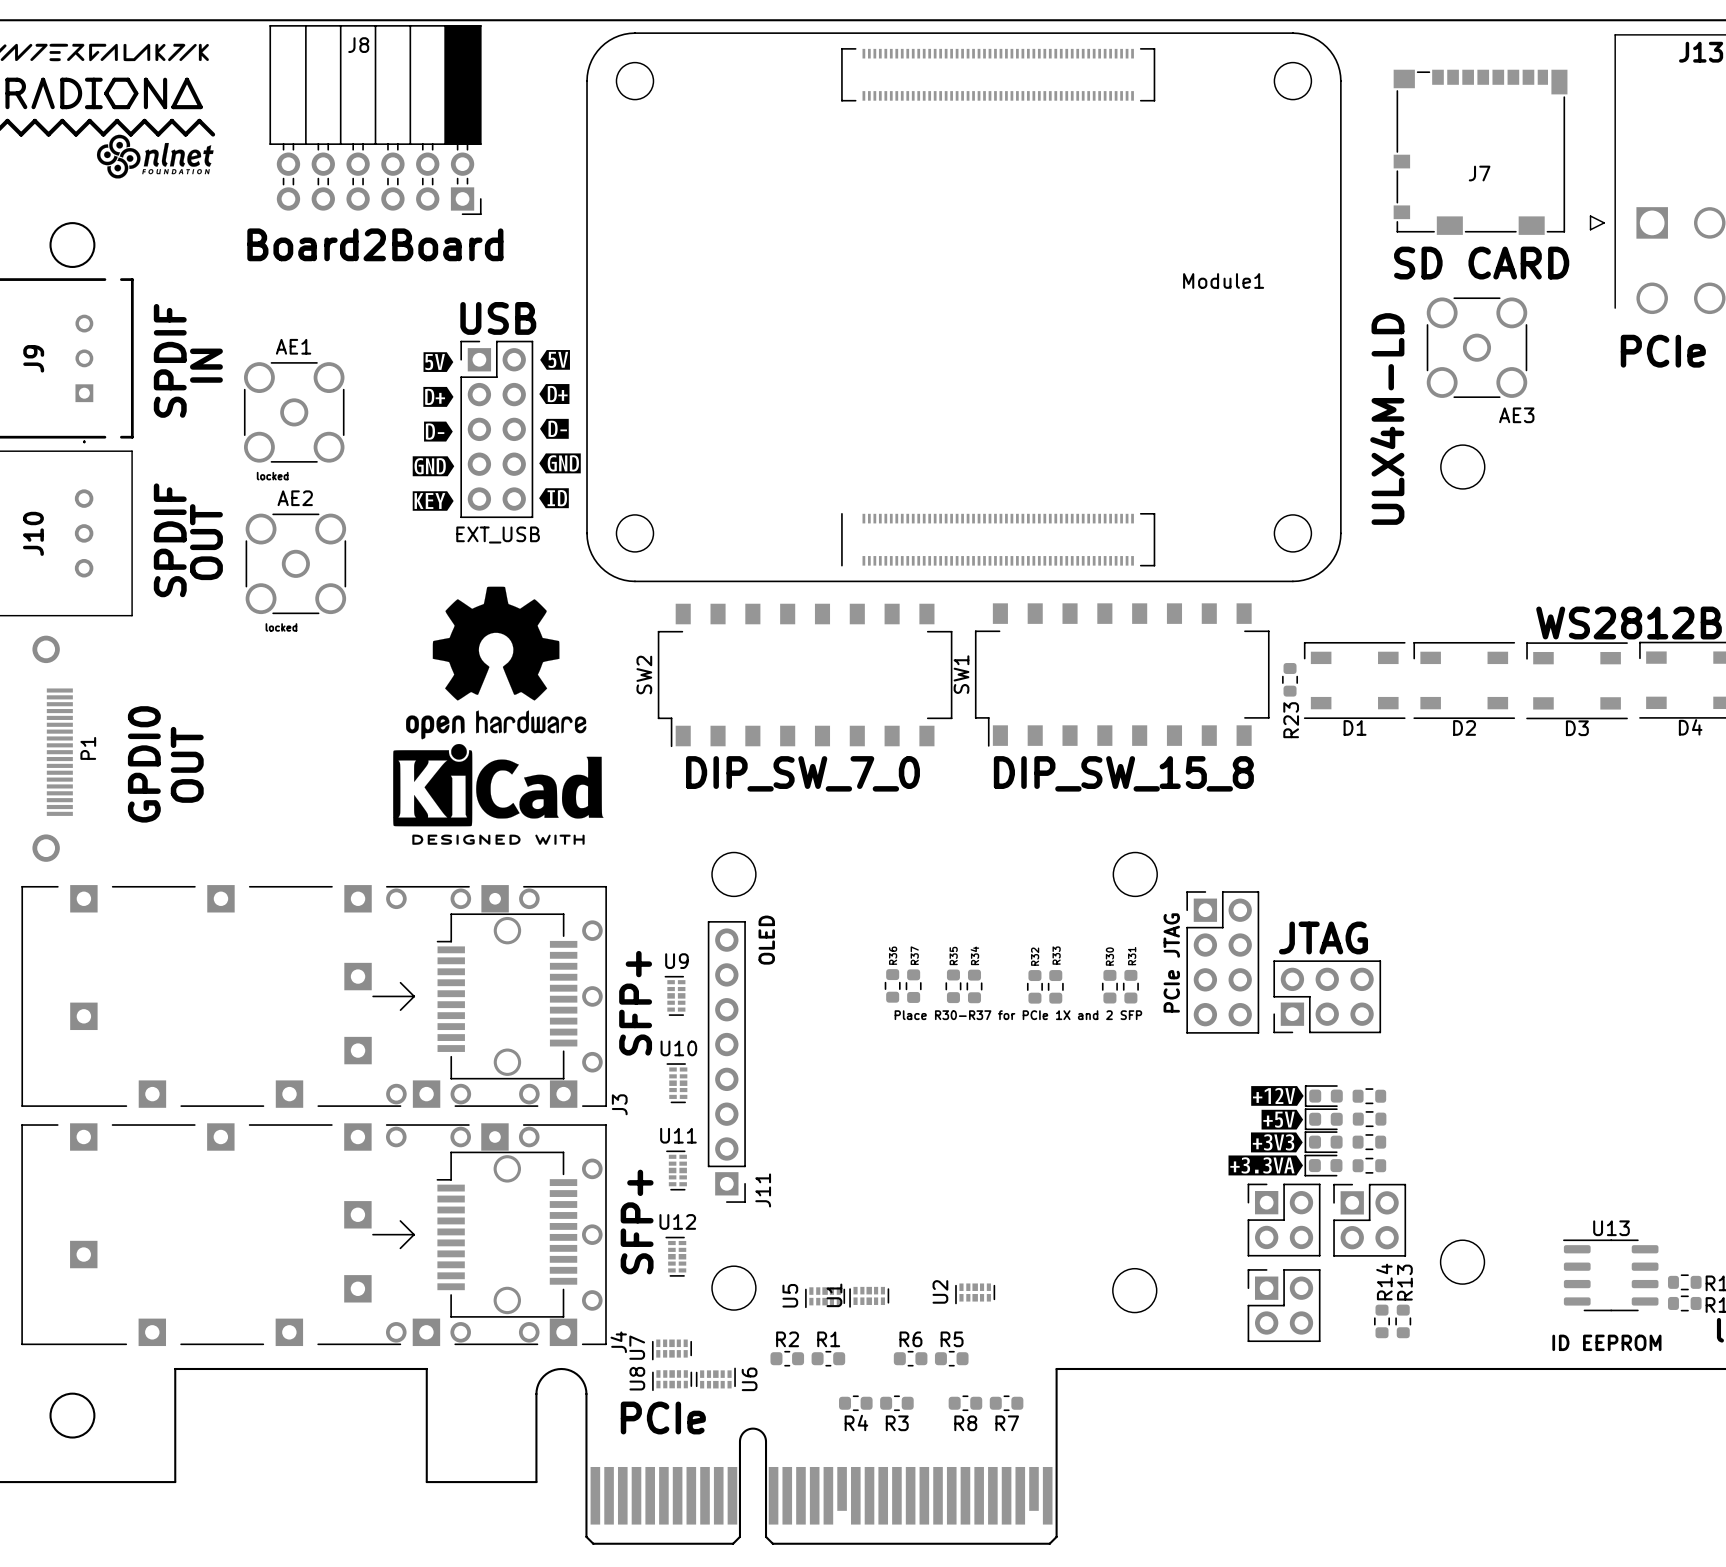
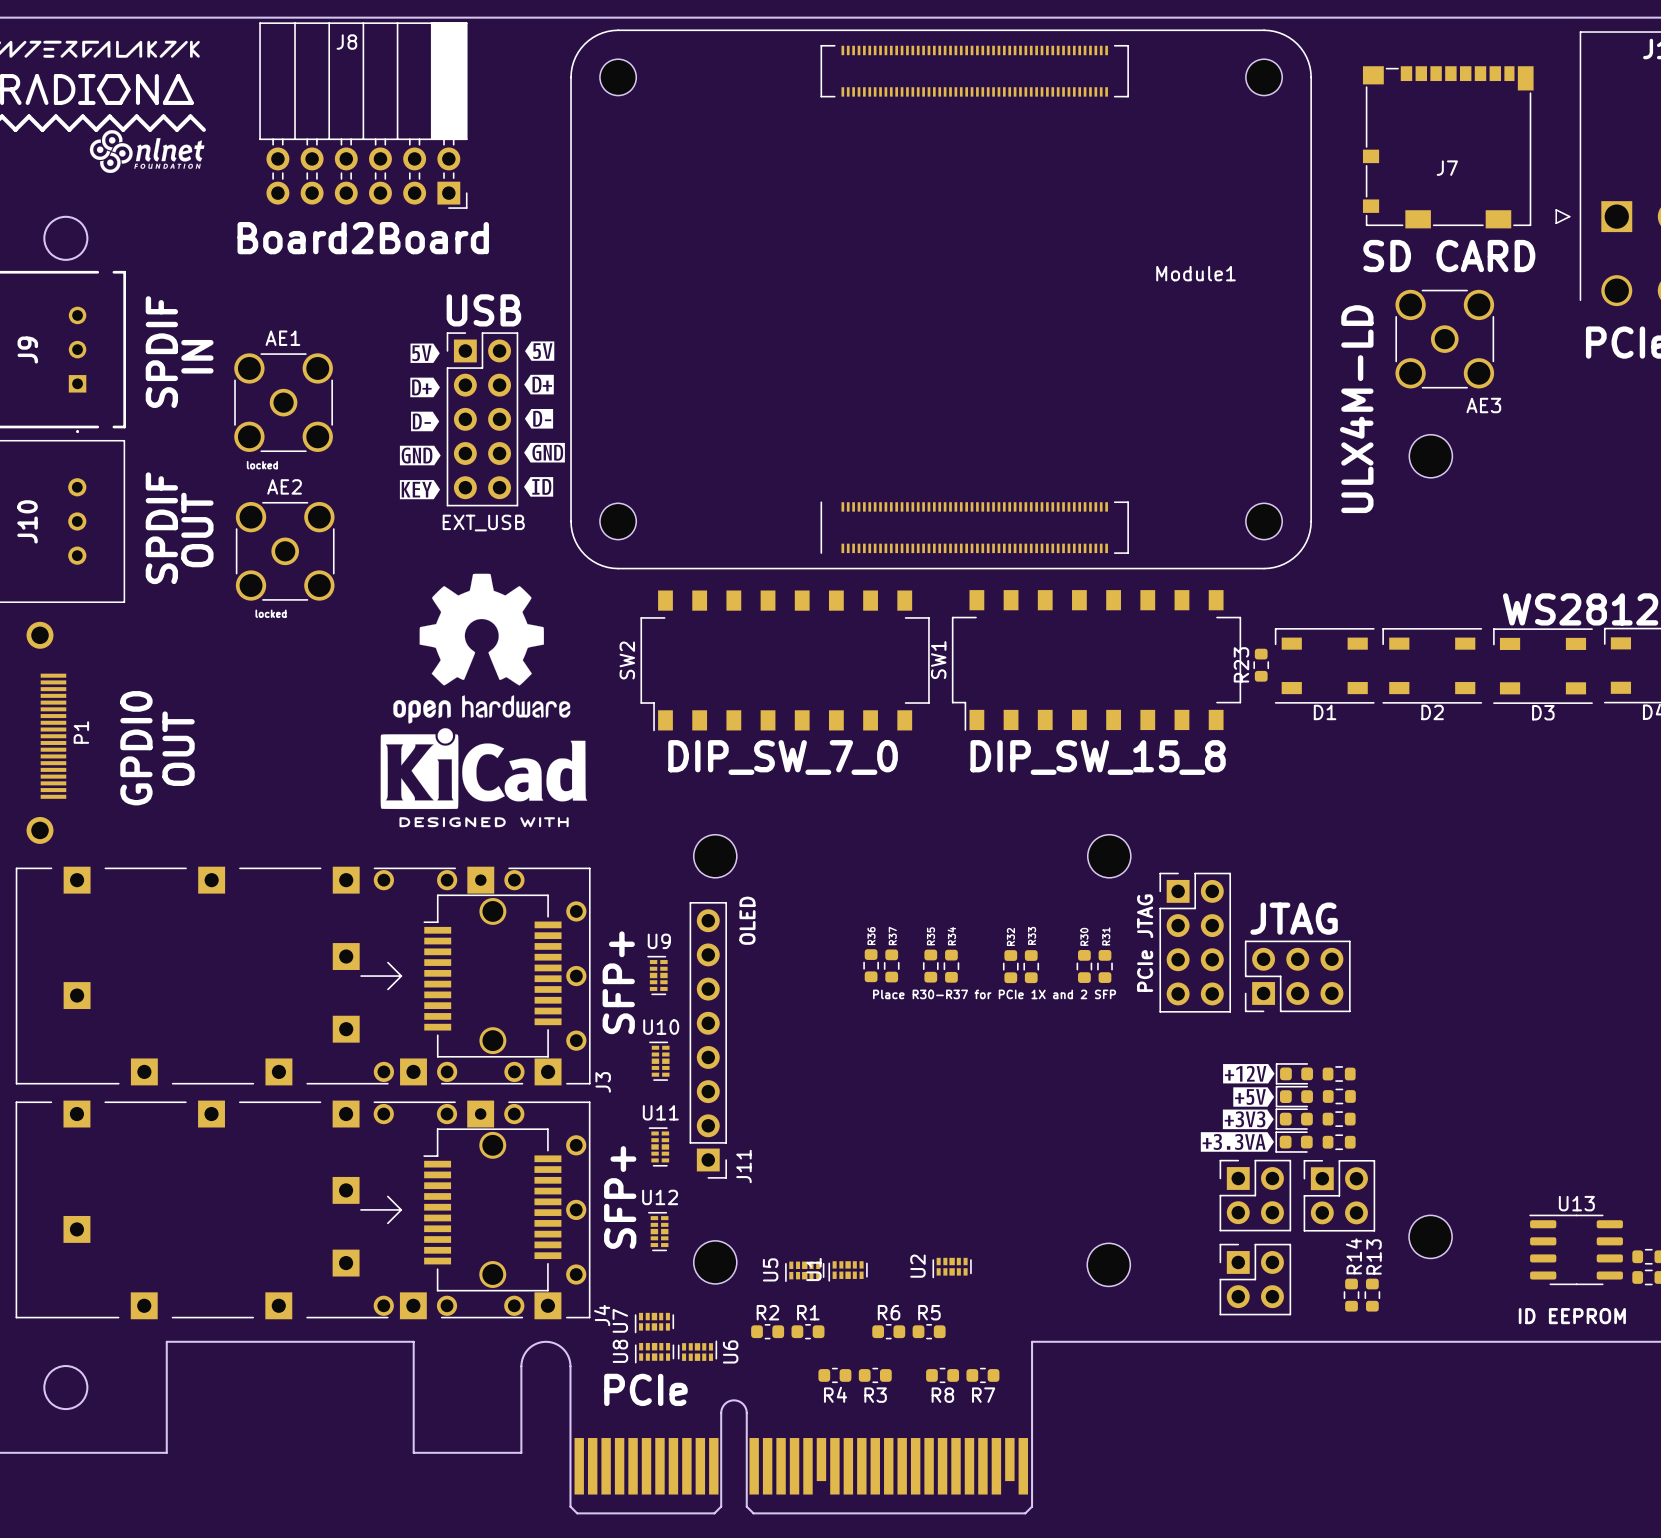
R23 name position: R23 (1291, 720) -> R23 (1241, 664)

